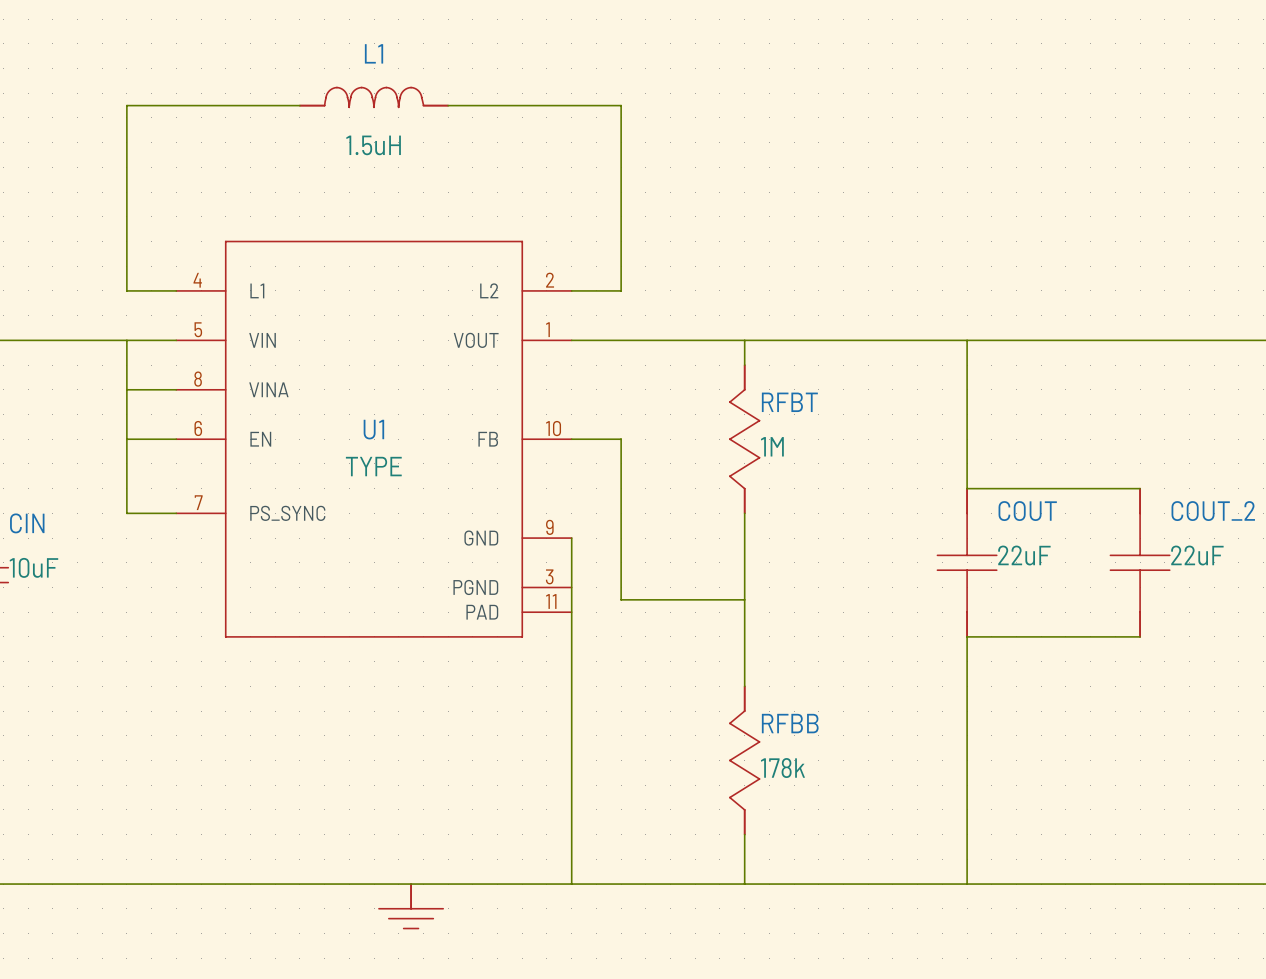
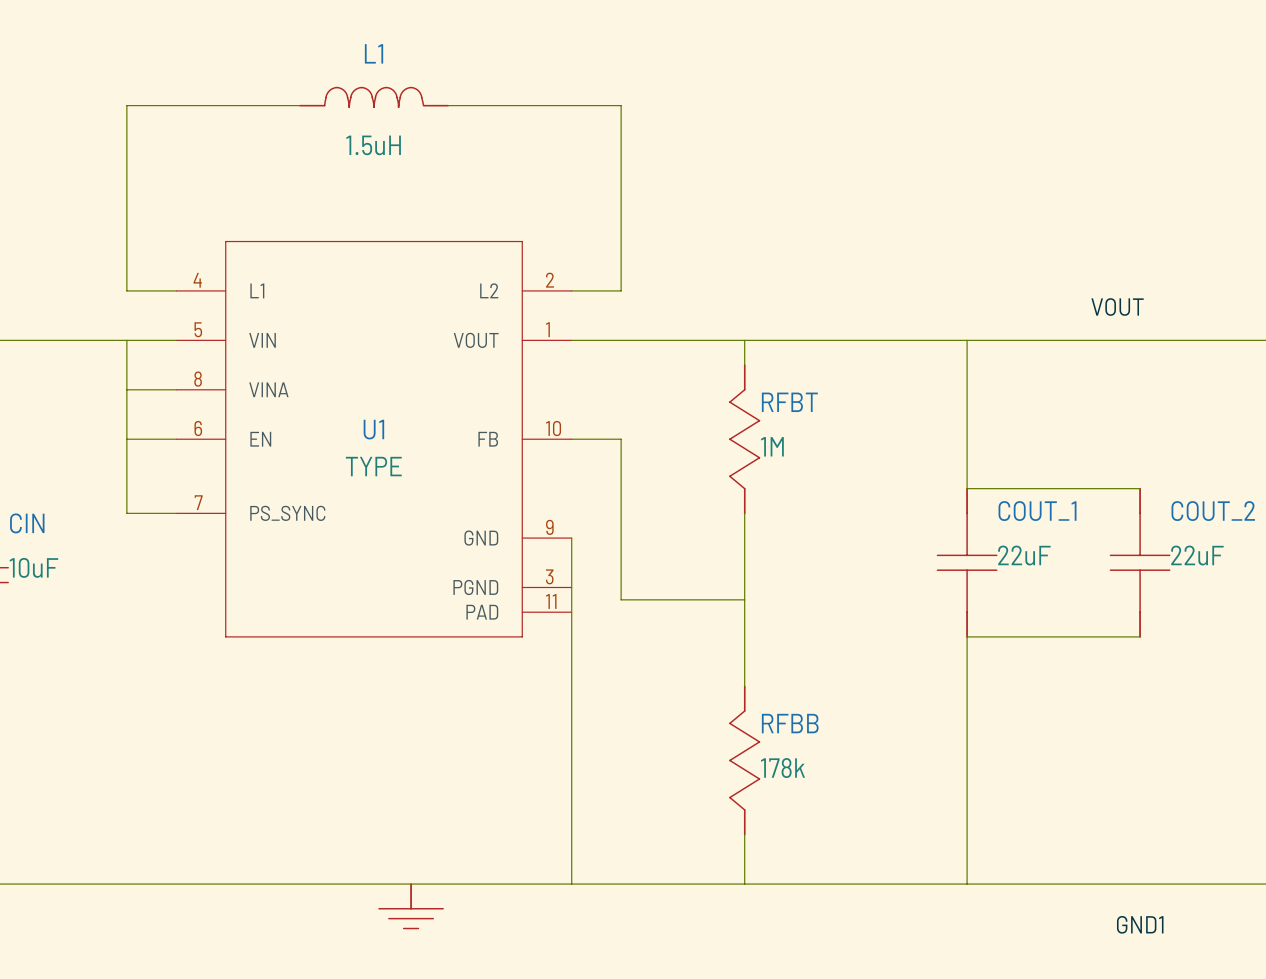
label: none -> VOUT (1117, 307)
COUT name: COUT (1027, 511) -> COUT_1 (1037, 511)
label: none -> GND1 (1140, 924)

